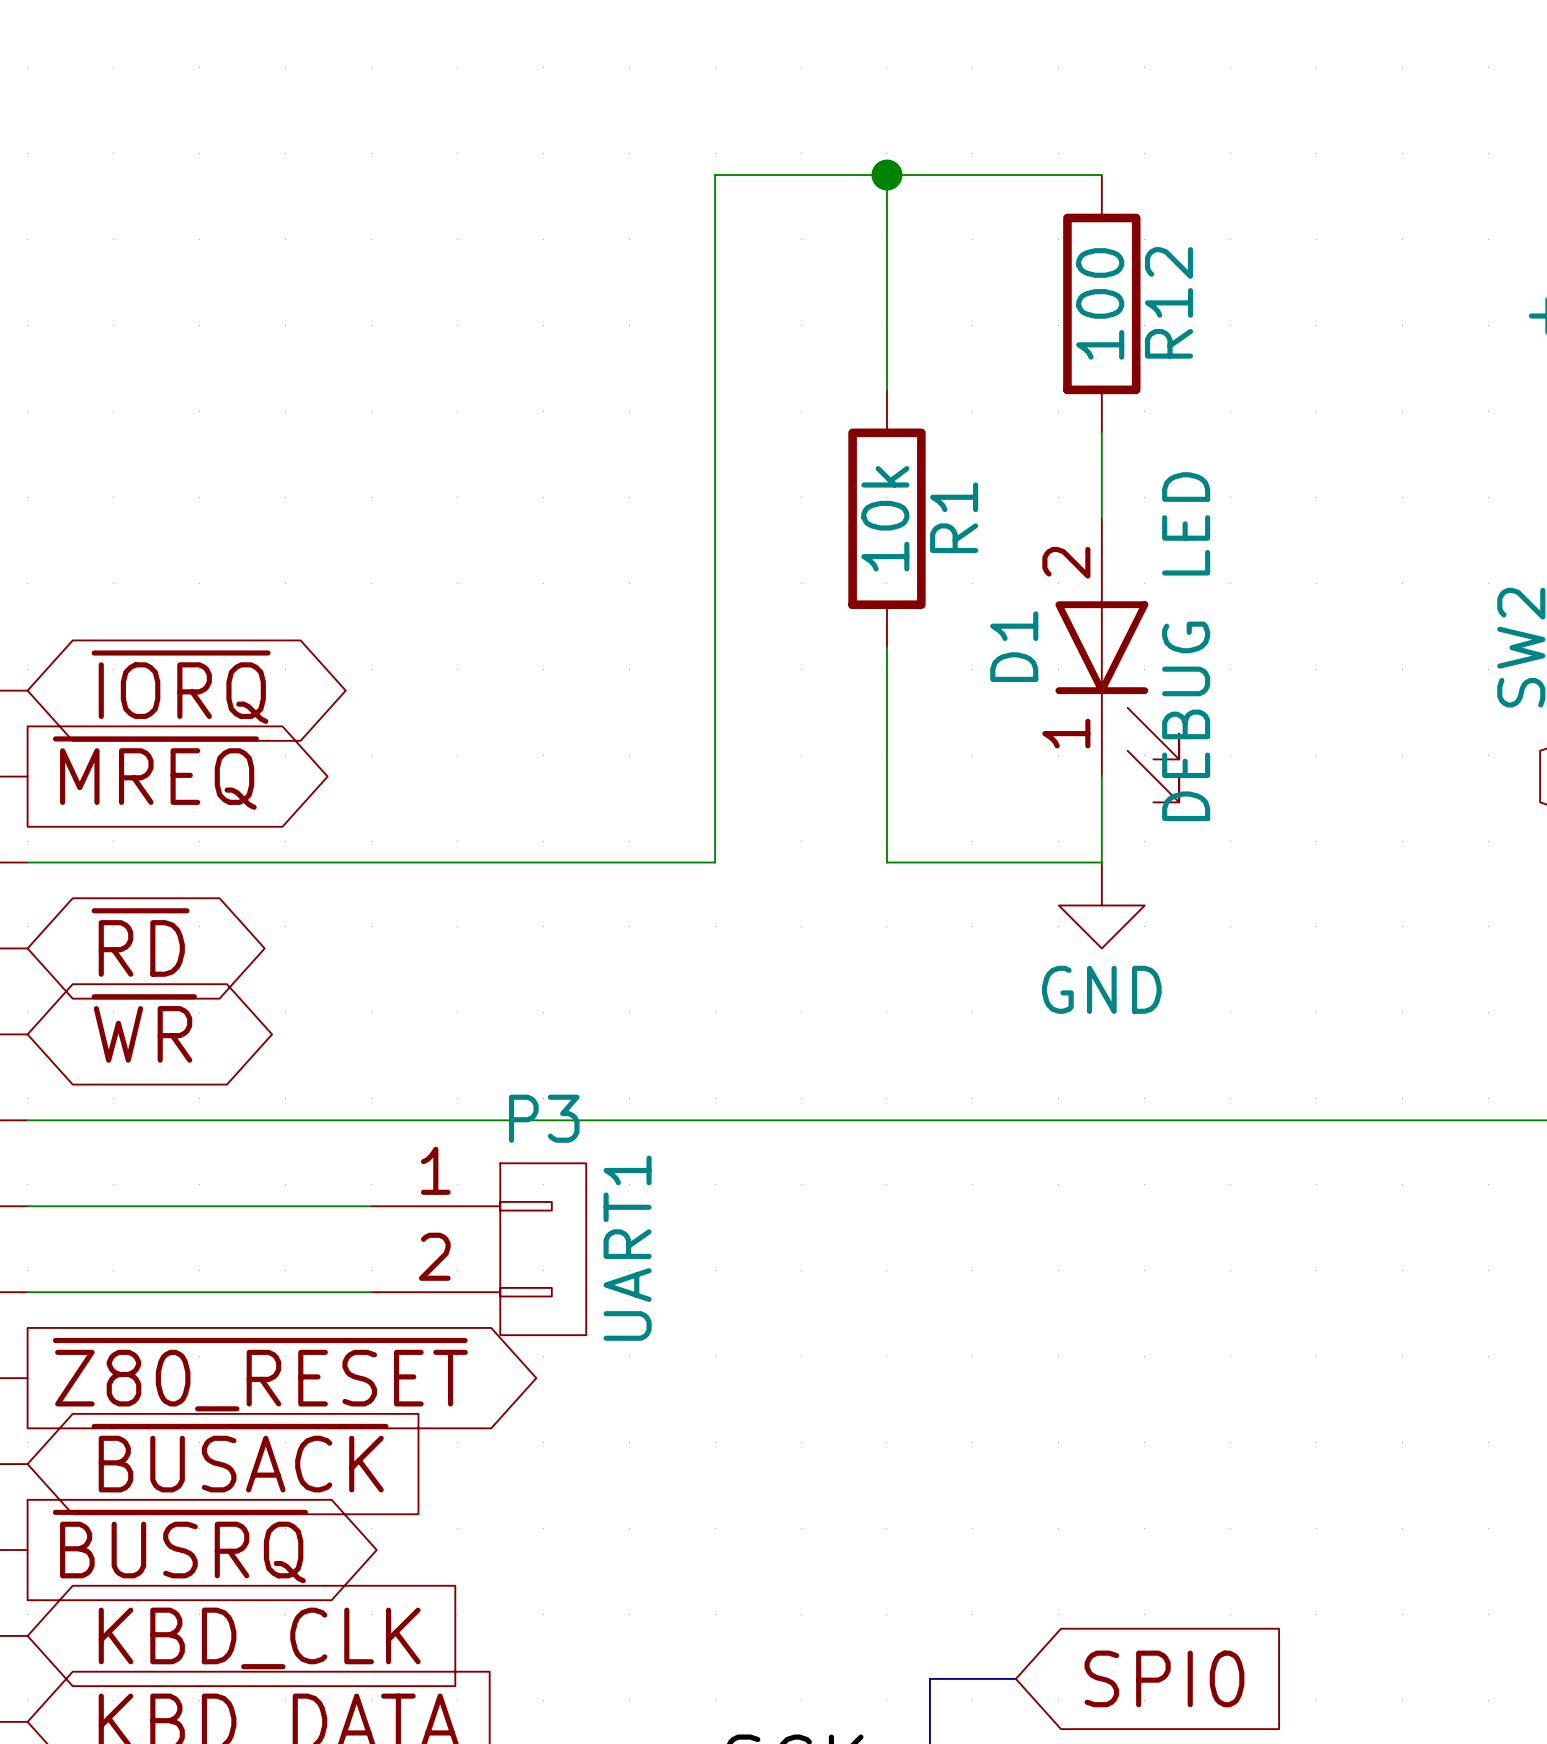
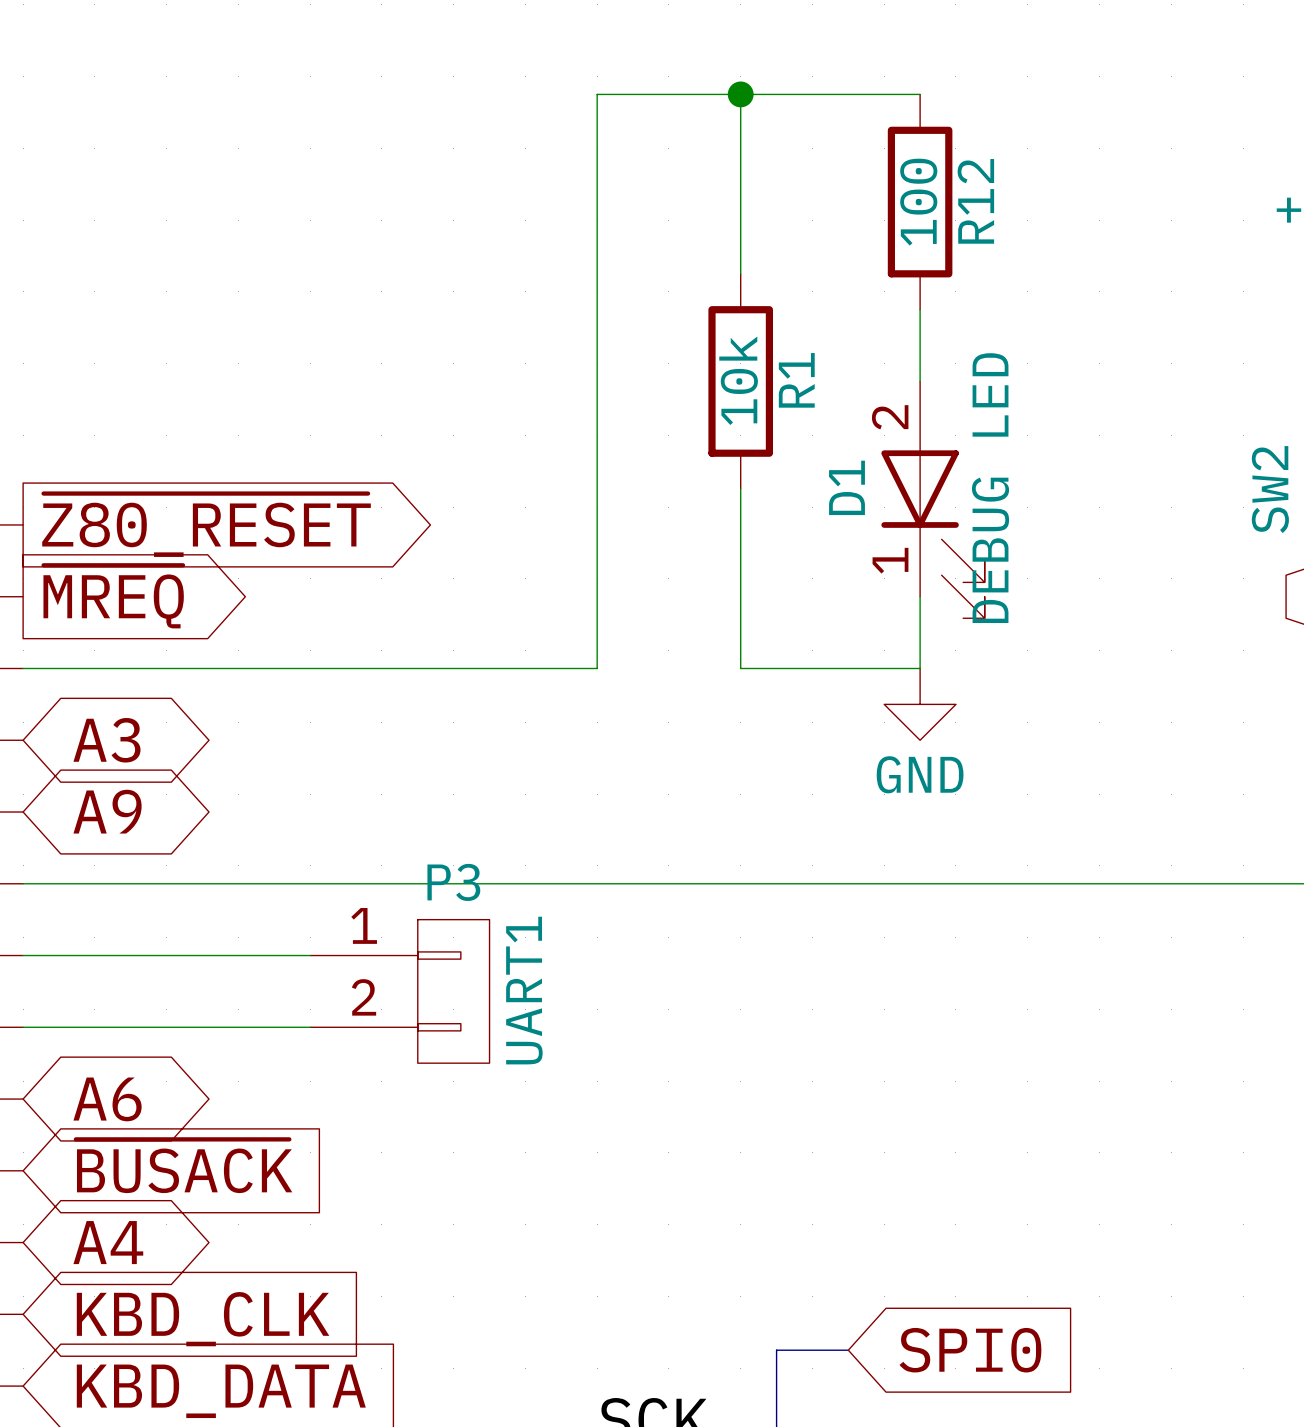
global label shape: bidirectional (181, 687) -> output (206, 525)
global label: ~{IORQ} (181, 687) -> ~{Z80_RESET} (206, 525)
global label: ~{RD} (140, 942) -> A3 (106, 740)
global label: ~{WR} (144, 1028) -> A9 (107, 811)
global label shape: output (260, 1374) -> bidirectional (107, 1099)
global label: ~{Z80_RESET} (260, 1374) -> A6 (107, 1099)
global label shape: output (180, 1546) -> bidirectional (108, 1242)
global label: ~{BUSRQ} (180, 1546) -> A4 (108, 1242)

